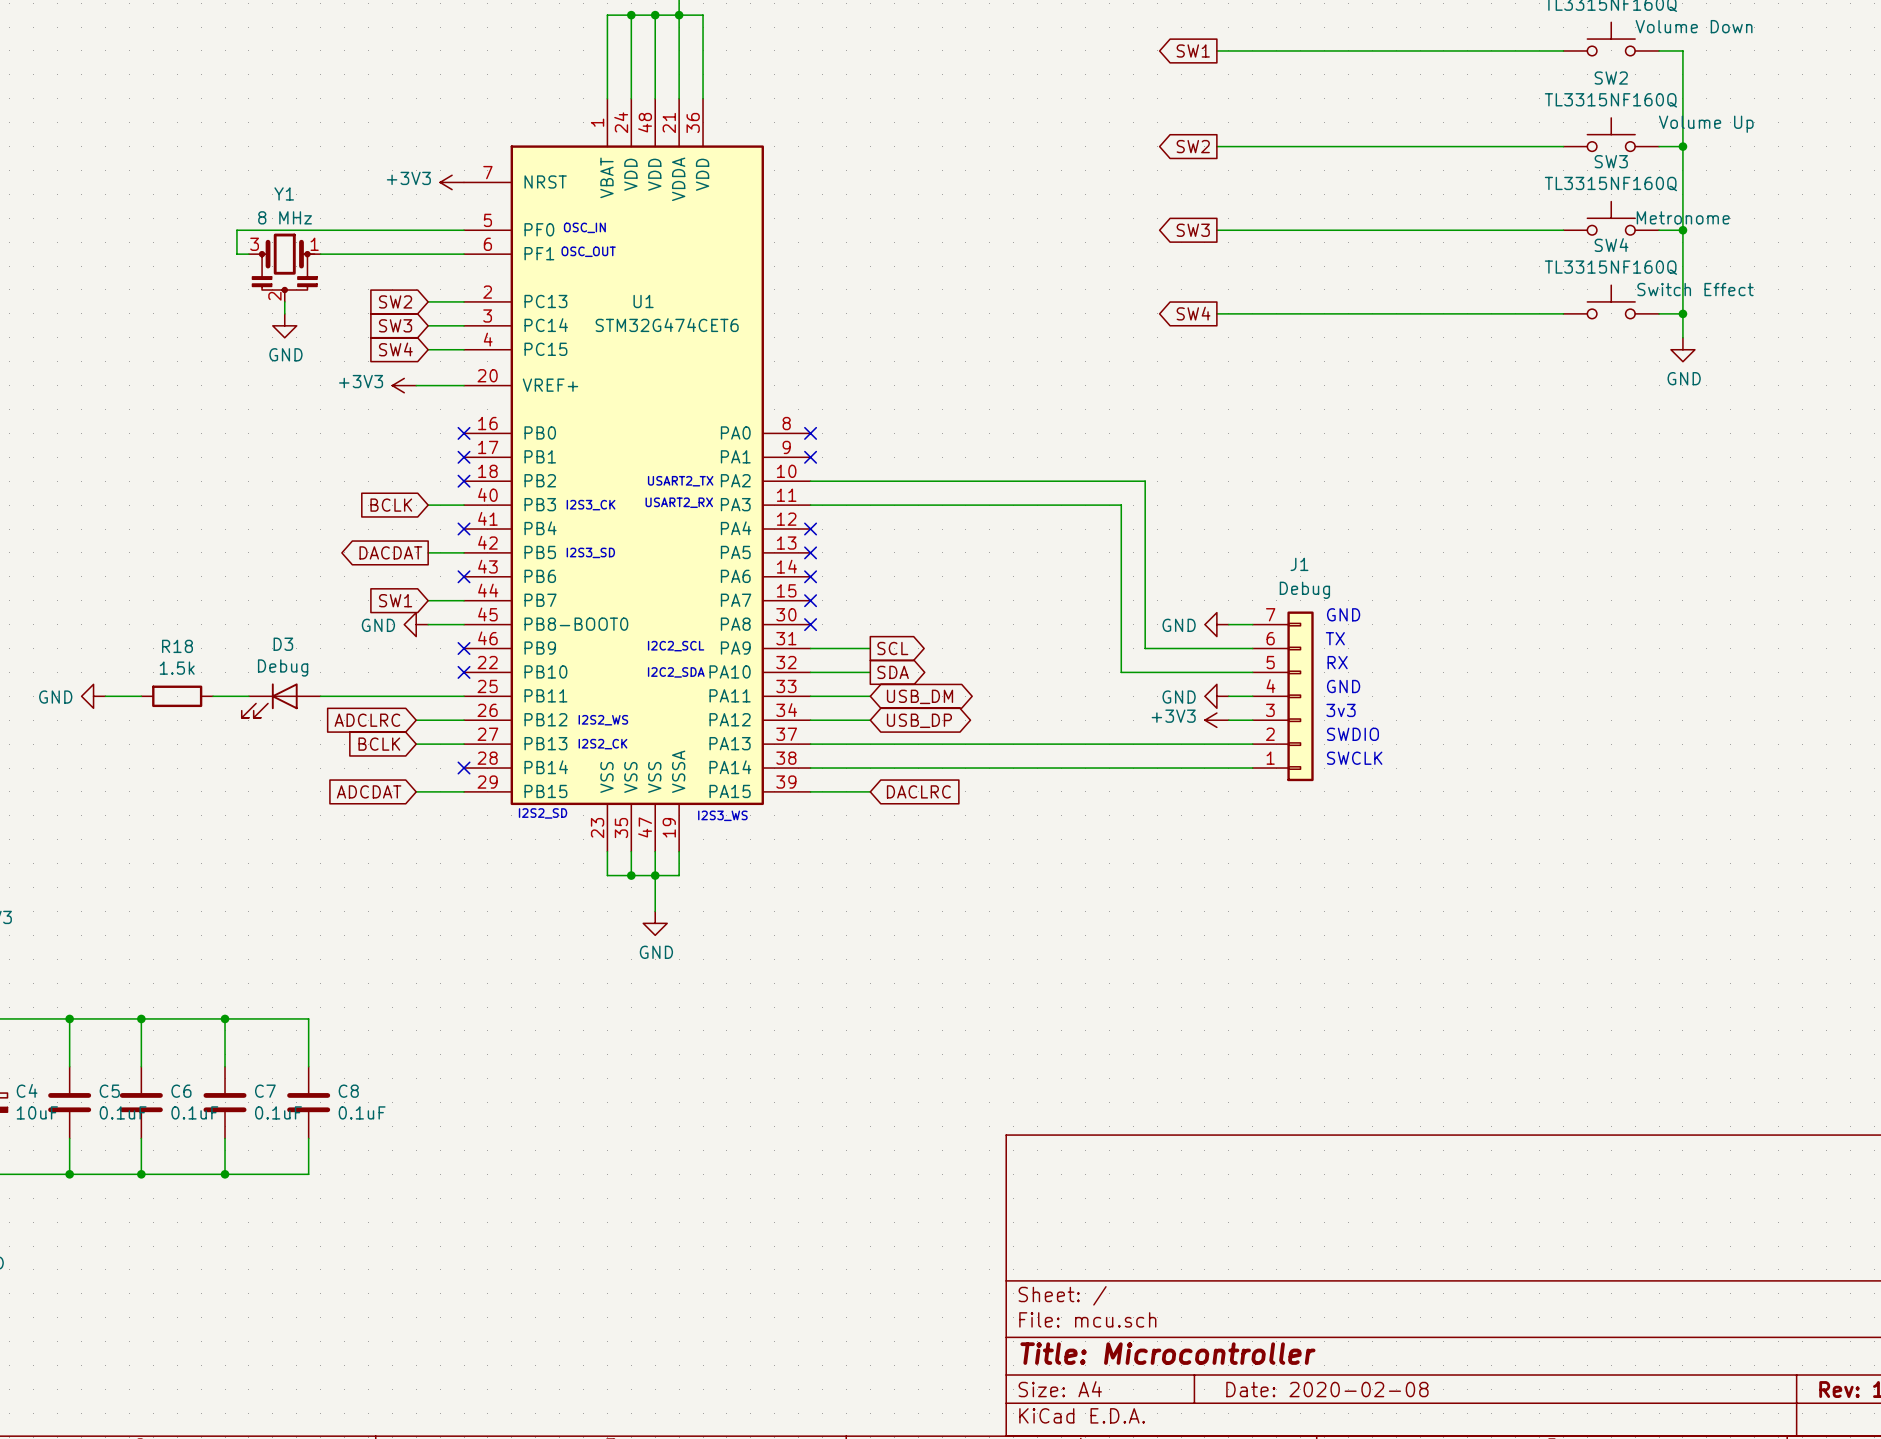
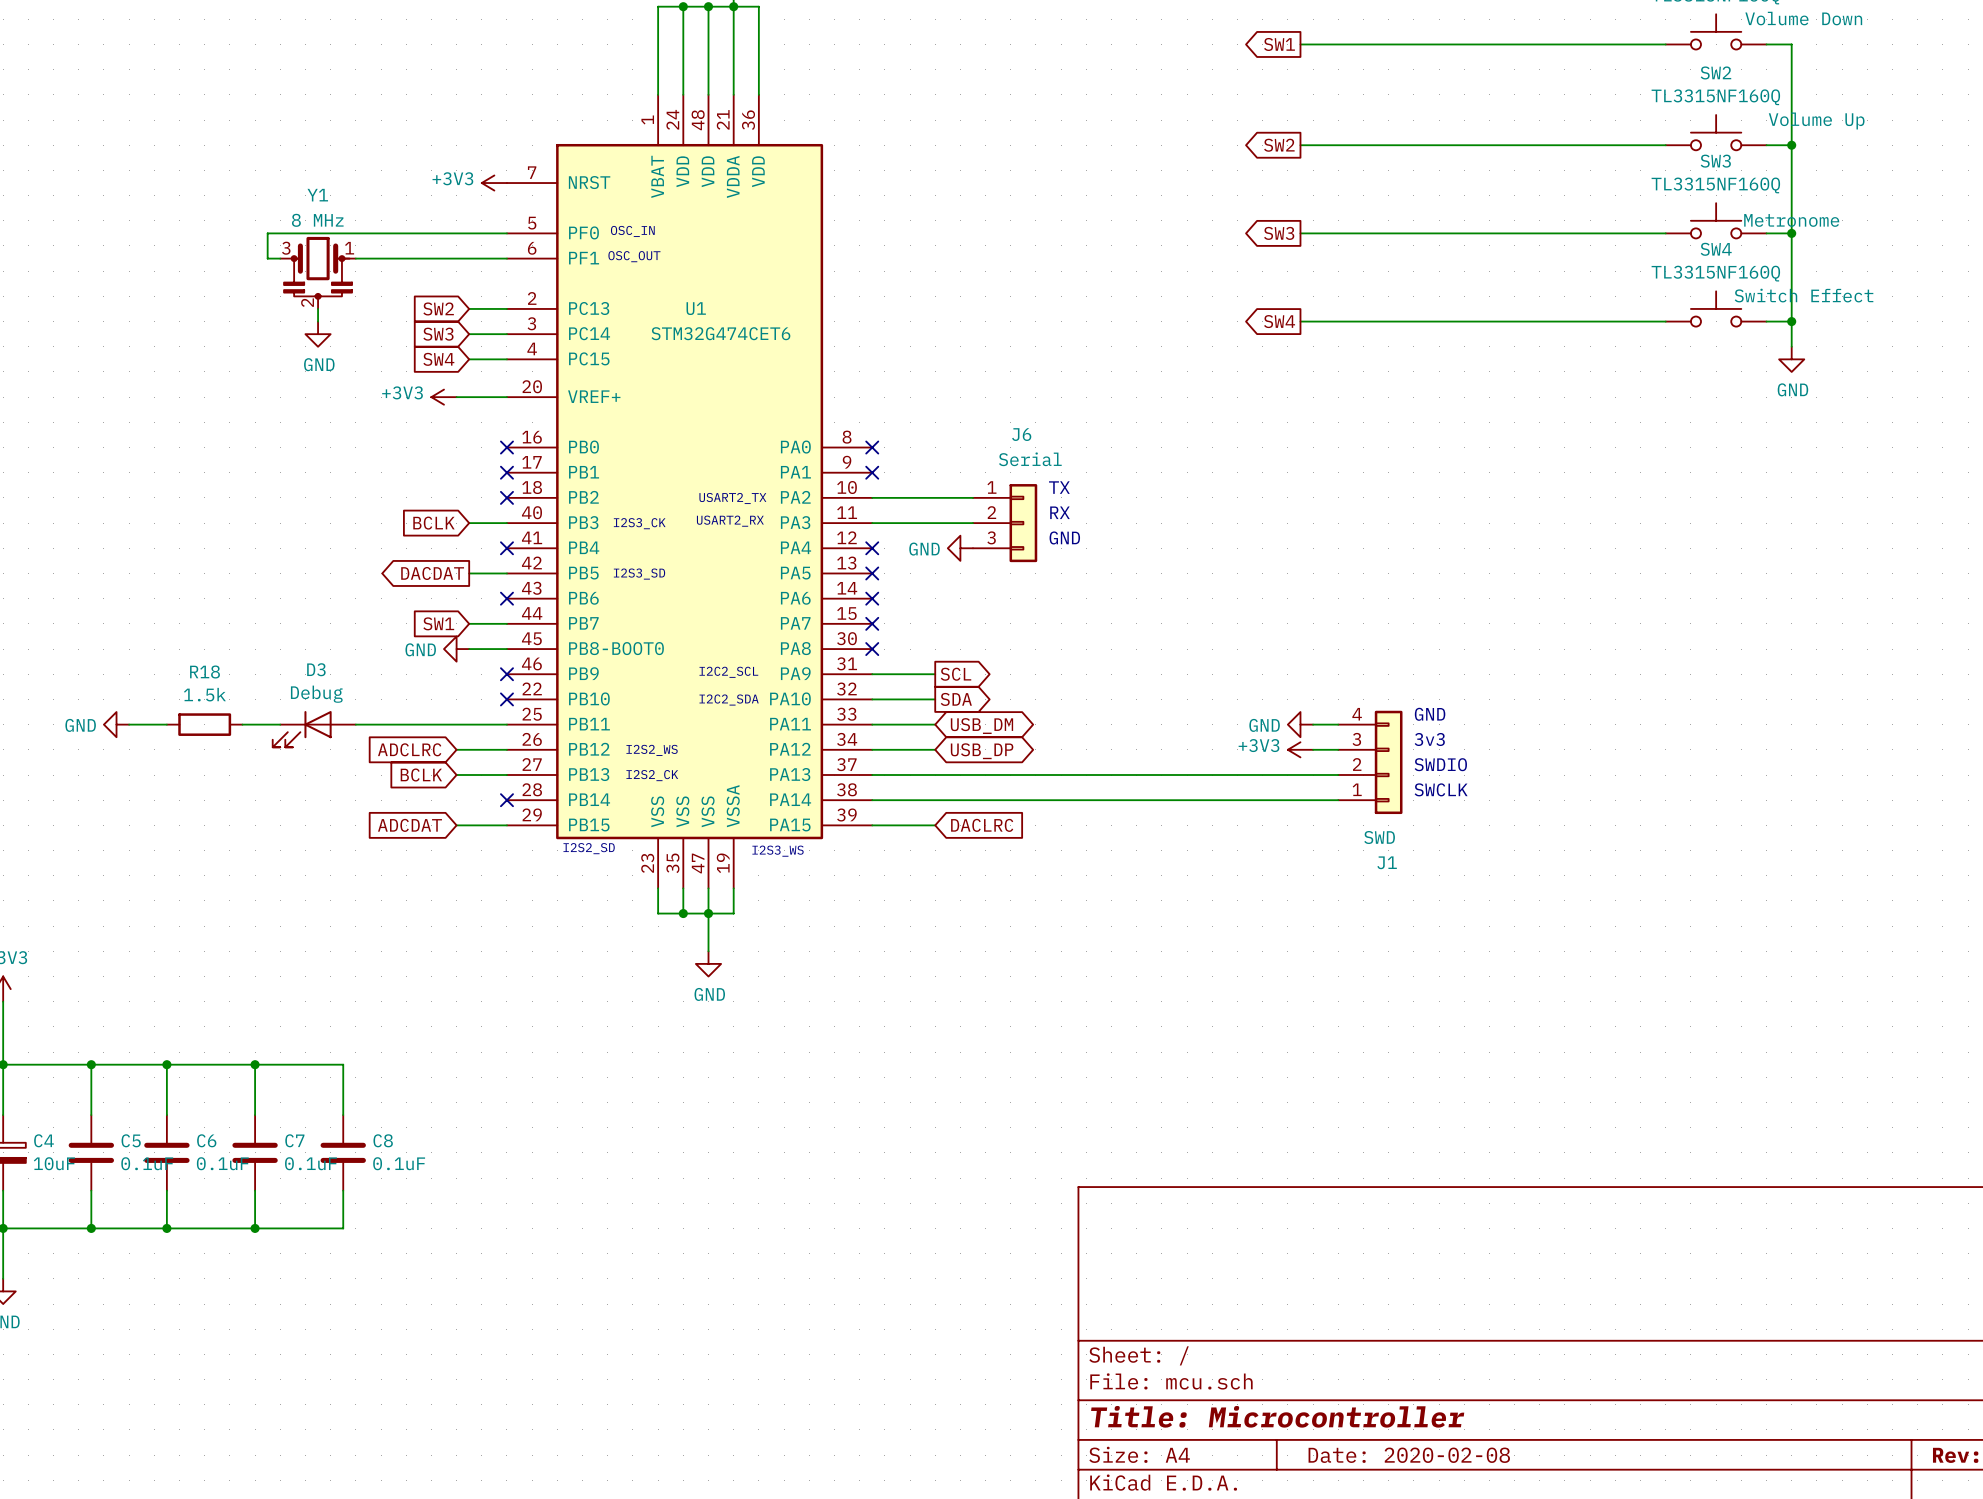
text: none -> TX (1059, 487)
wire: (906, 481) (1145, 481) (1145, 648) (1252, 648) -> none
text: none -> RX (1059, 512)
wire: (906, 505) (1121, 505) (1121, 672) (1252, 672) -> none
J6: none -> Serial (1005, 523)
text: none -> GND (1064, 537)
power symbol: none -> GND (960, 548)
J1 name position: J1 (1299, 564) -> J1 (1387, 862)
J1 value: Debug (1304, 590) -> SWD (1379, 837)
J1 symbol: [1252, 611, 1314, 782] -> [1338, 710, 1403, 815]
text: GND (1343, 614) -> none
power symbol: GND (1216, 624) -> none
wire: (1228, 624) (1252, 624) -> none
text: TX (1335, 638) -> none
text: RX (1337, 662) -> none

